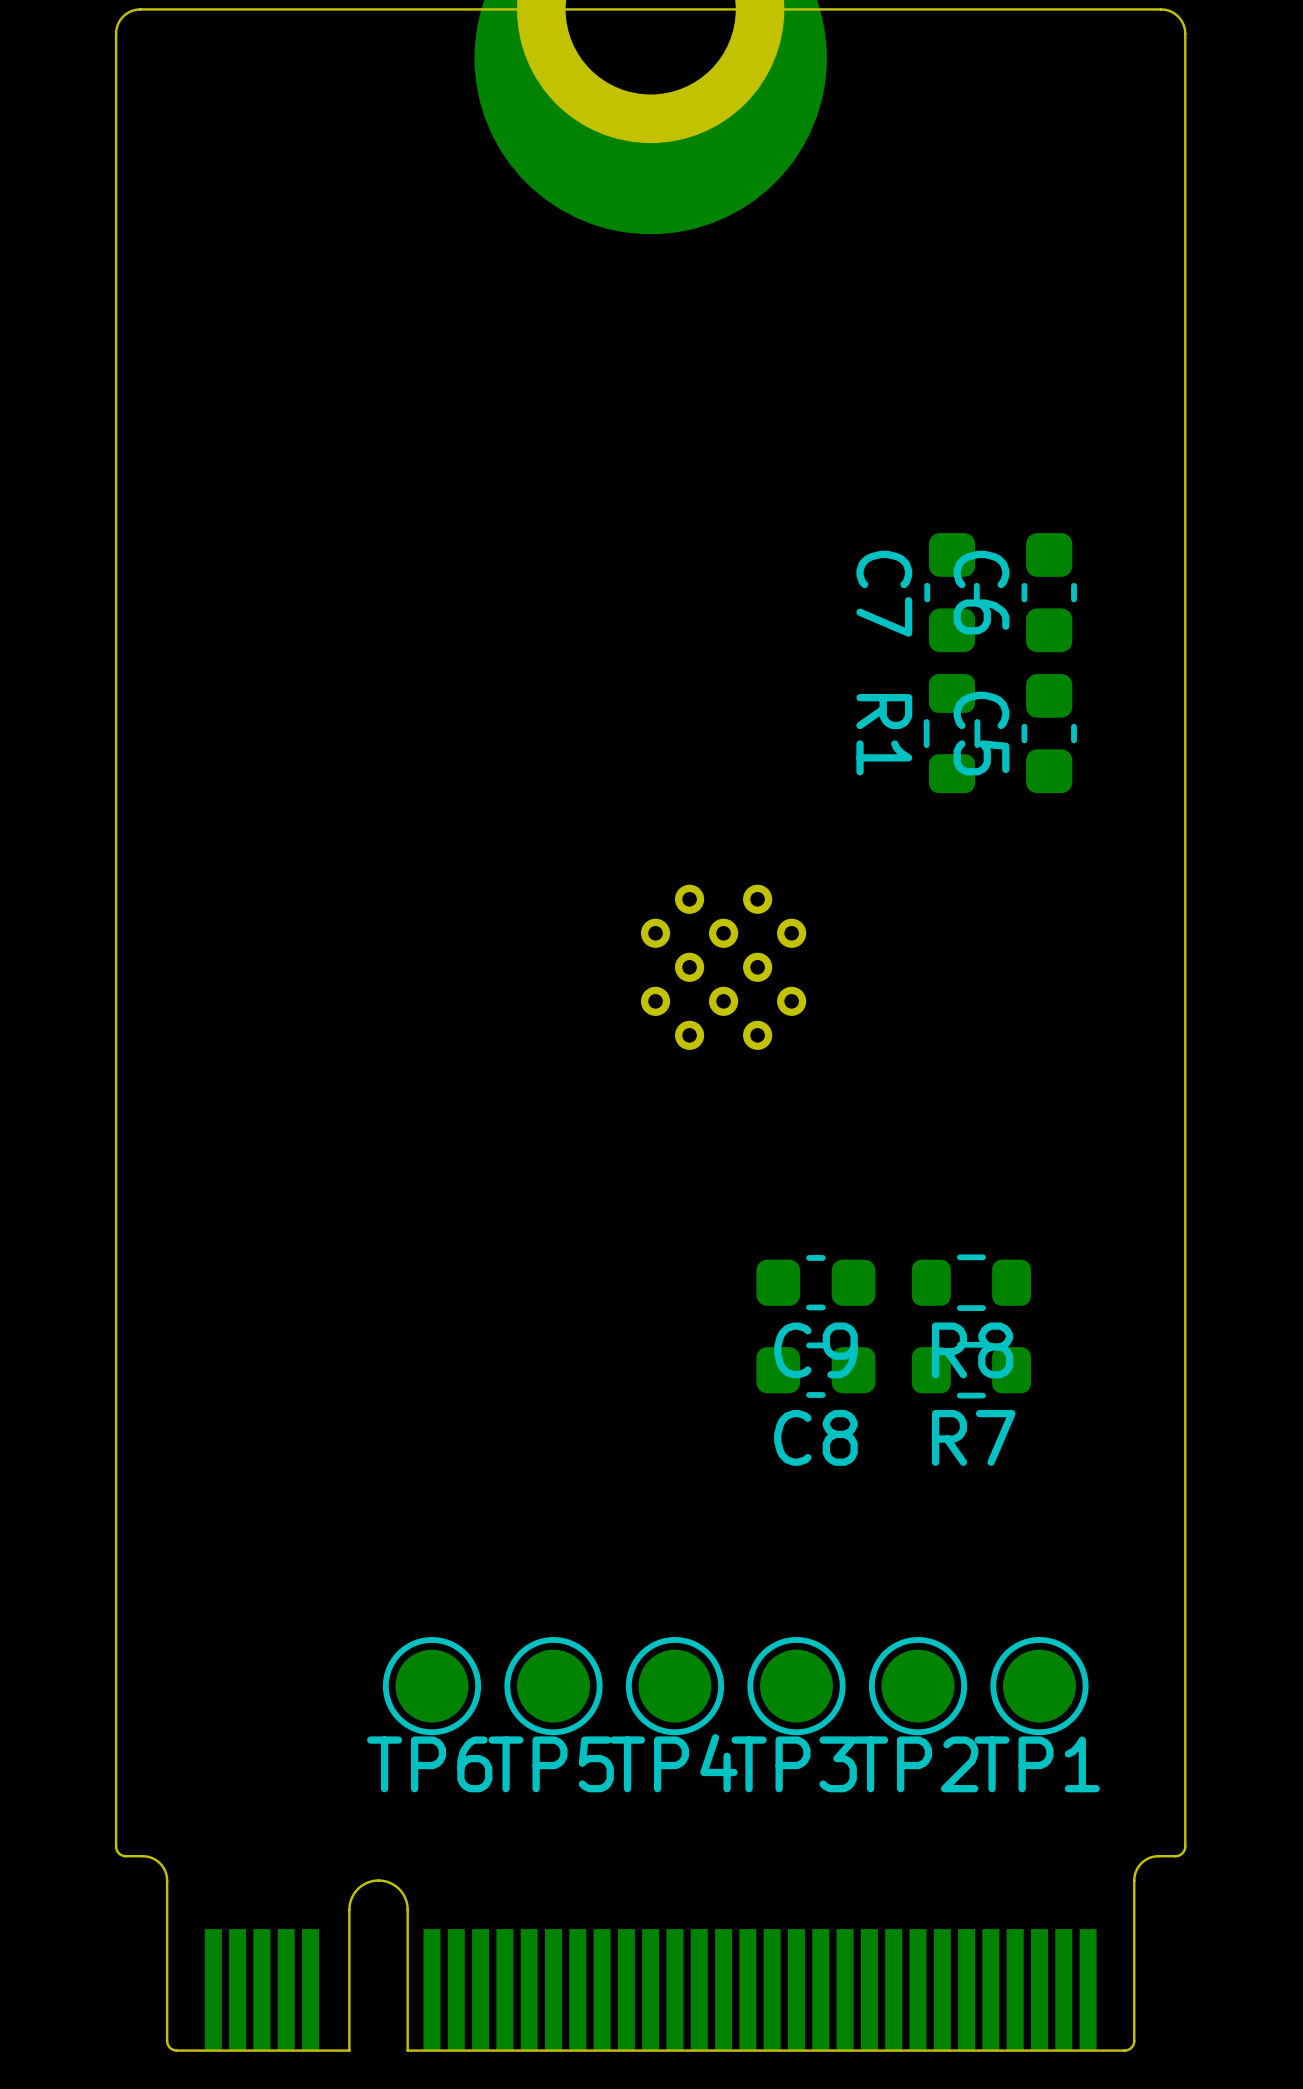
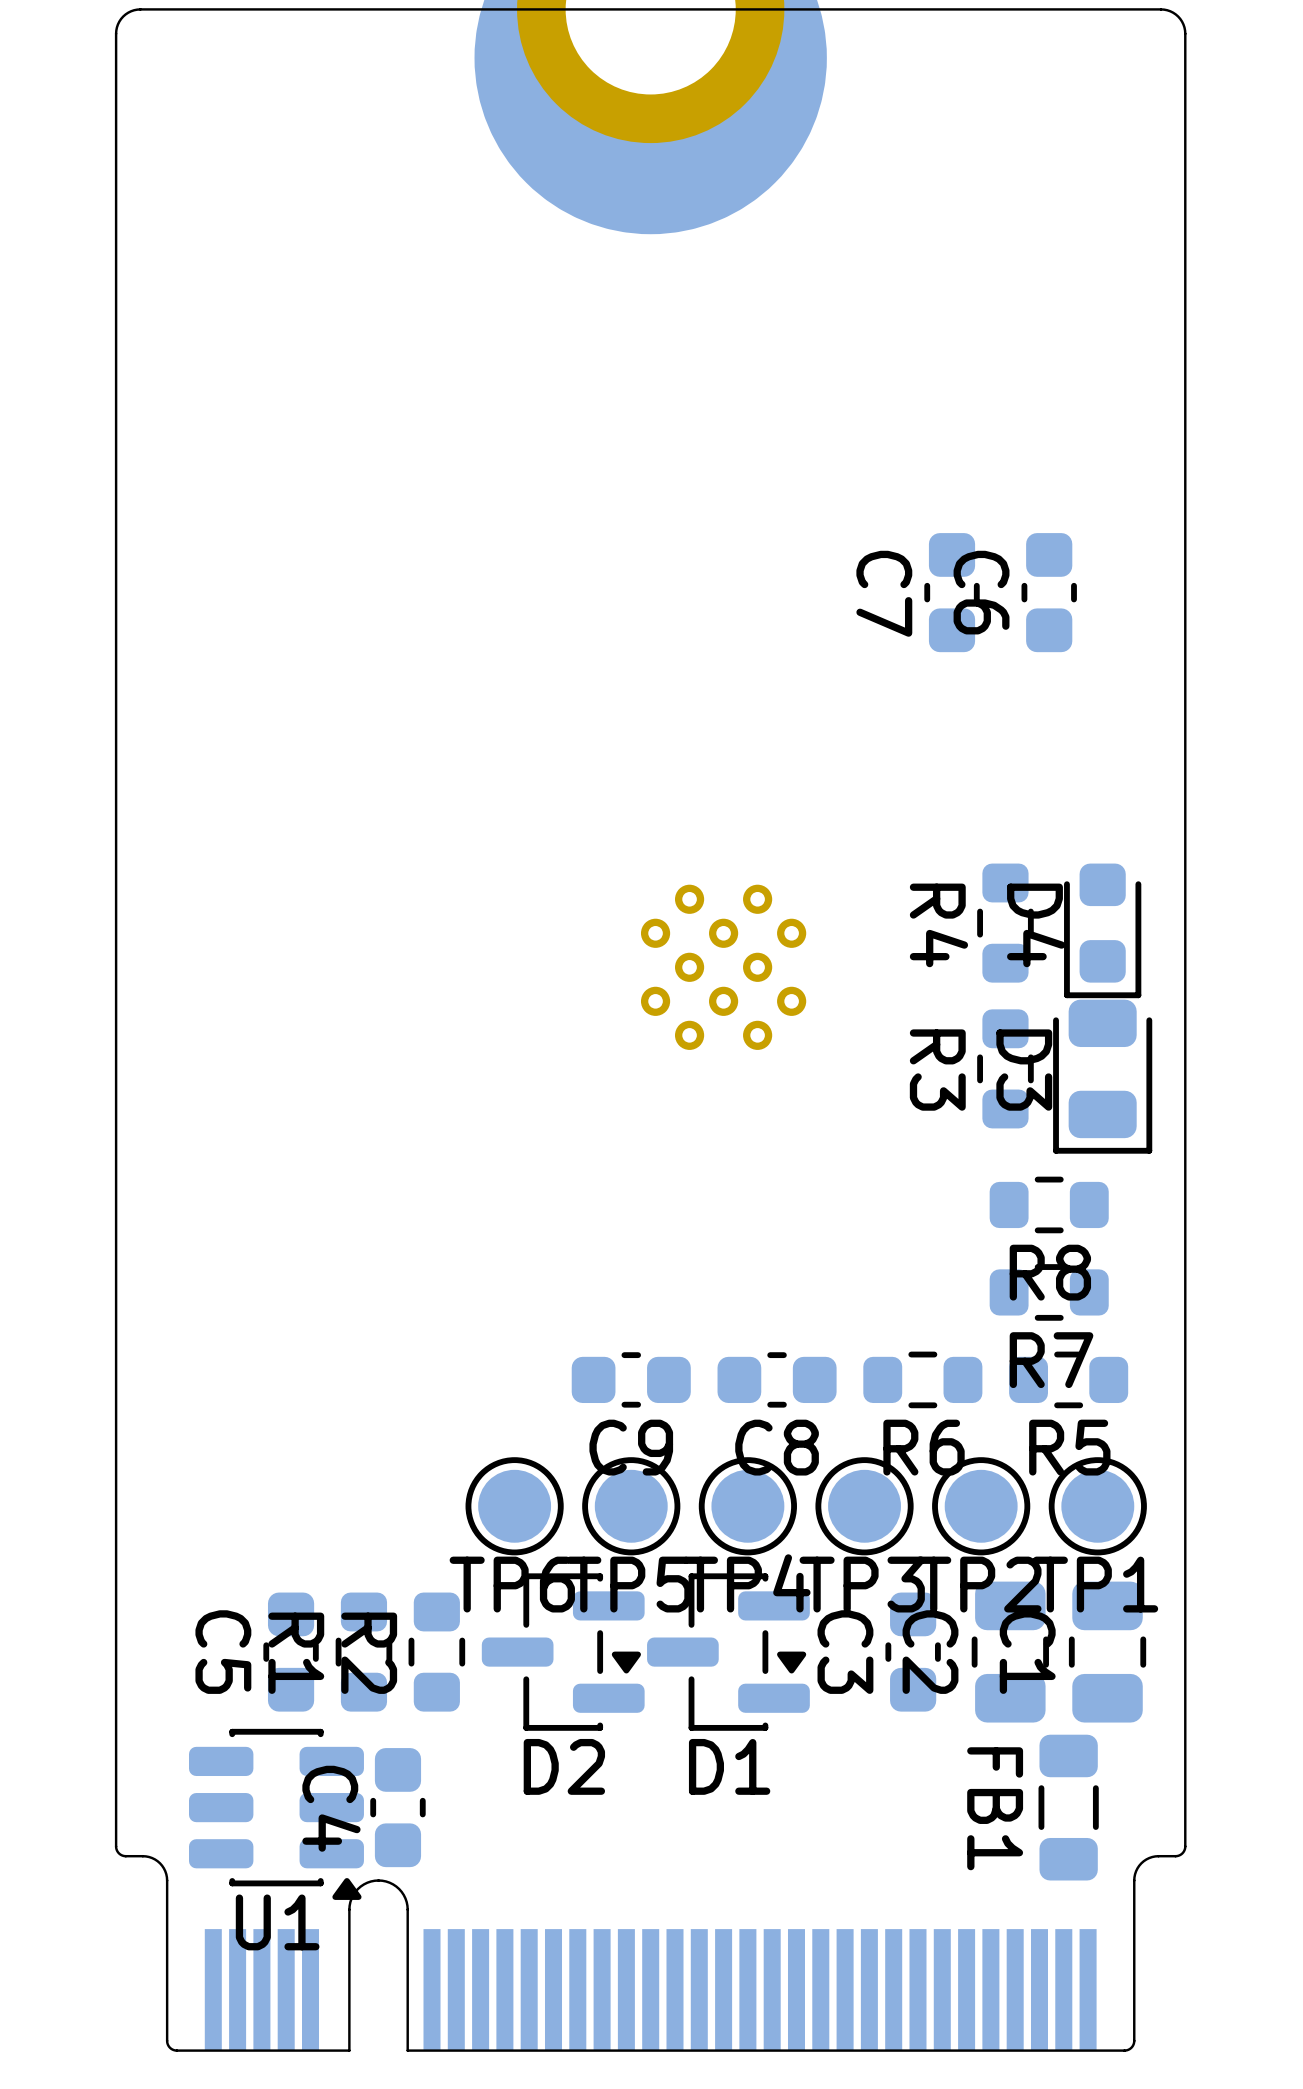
R1 position: (952, 733) -> (363, 1652)
C5 position: (1049, 733) -> (291, 1652)
R4: none -> (1005, 923)
D4: none -> (1102, 930)
R3: none -> (1005, 1068)
D3: none -> (1102, 1076)
C9 position: (815, 1282) -> (631, 1379)
R8 position: (971, 1282) -> (1049, 1204)
C8 position: (815, 1370) -> (777, 1379)
R7 position: (971, 1370) -> (1049, 1292)
R6: none -> (922, 1379)
R5: none -> (1068, 1379)
R2: none -> (436, 1652)
D2: none -> (563, 1652)
D1: none -> (728, 1652)
C3: none -> (913, 1652)
C2: none -> (1010, 1652)
C1: none -> (1107, 1652)
TP6 position: (432, 1686) -> (514, 1506)
TP5 position: (553, 1686) -> (631, 1506)
TP4 position: (674, 1686) -> (747, 1506)
TP3 position: (796, 1686) -> (864, 1506)
TP2 position: (917, 1686) -> (981, 1506)
TP1 position: (1039, 1686) -> (1097, 1506)
C4: none -> (397, 1807)
FB1: none -> (1068, 1807)
U1: none -> (276, 1814)

